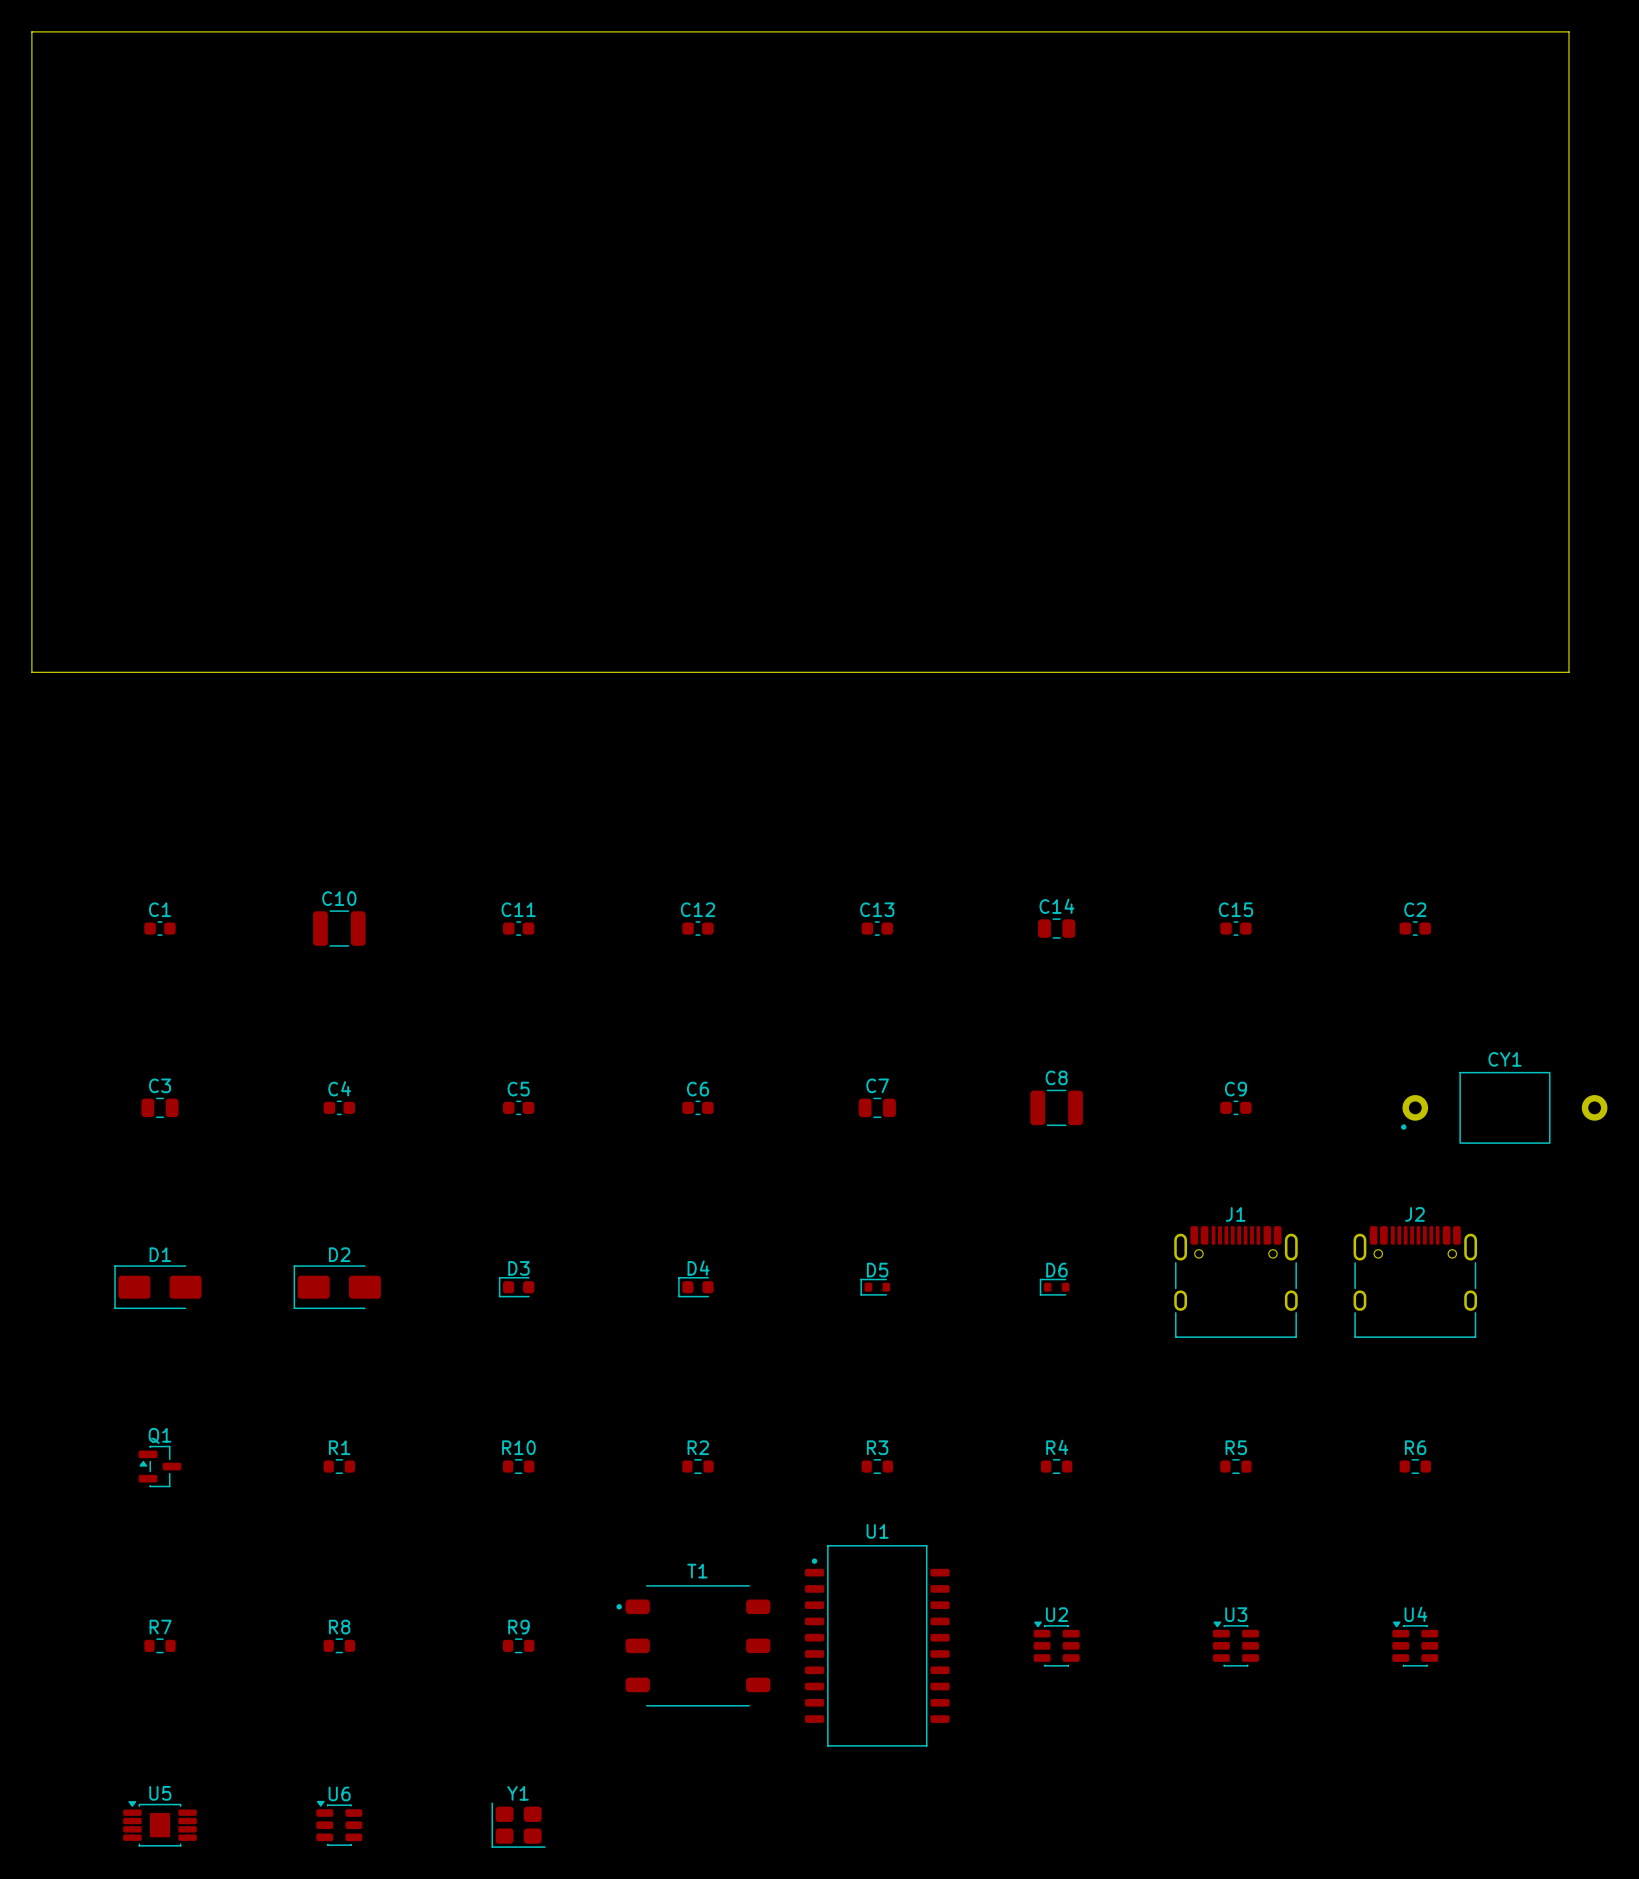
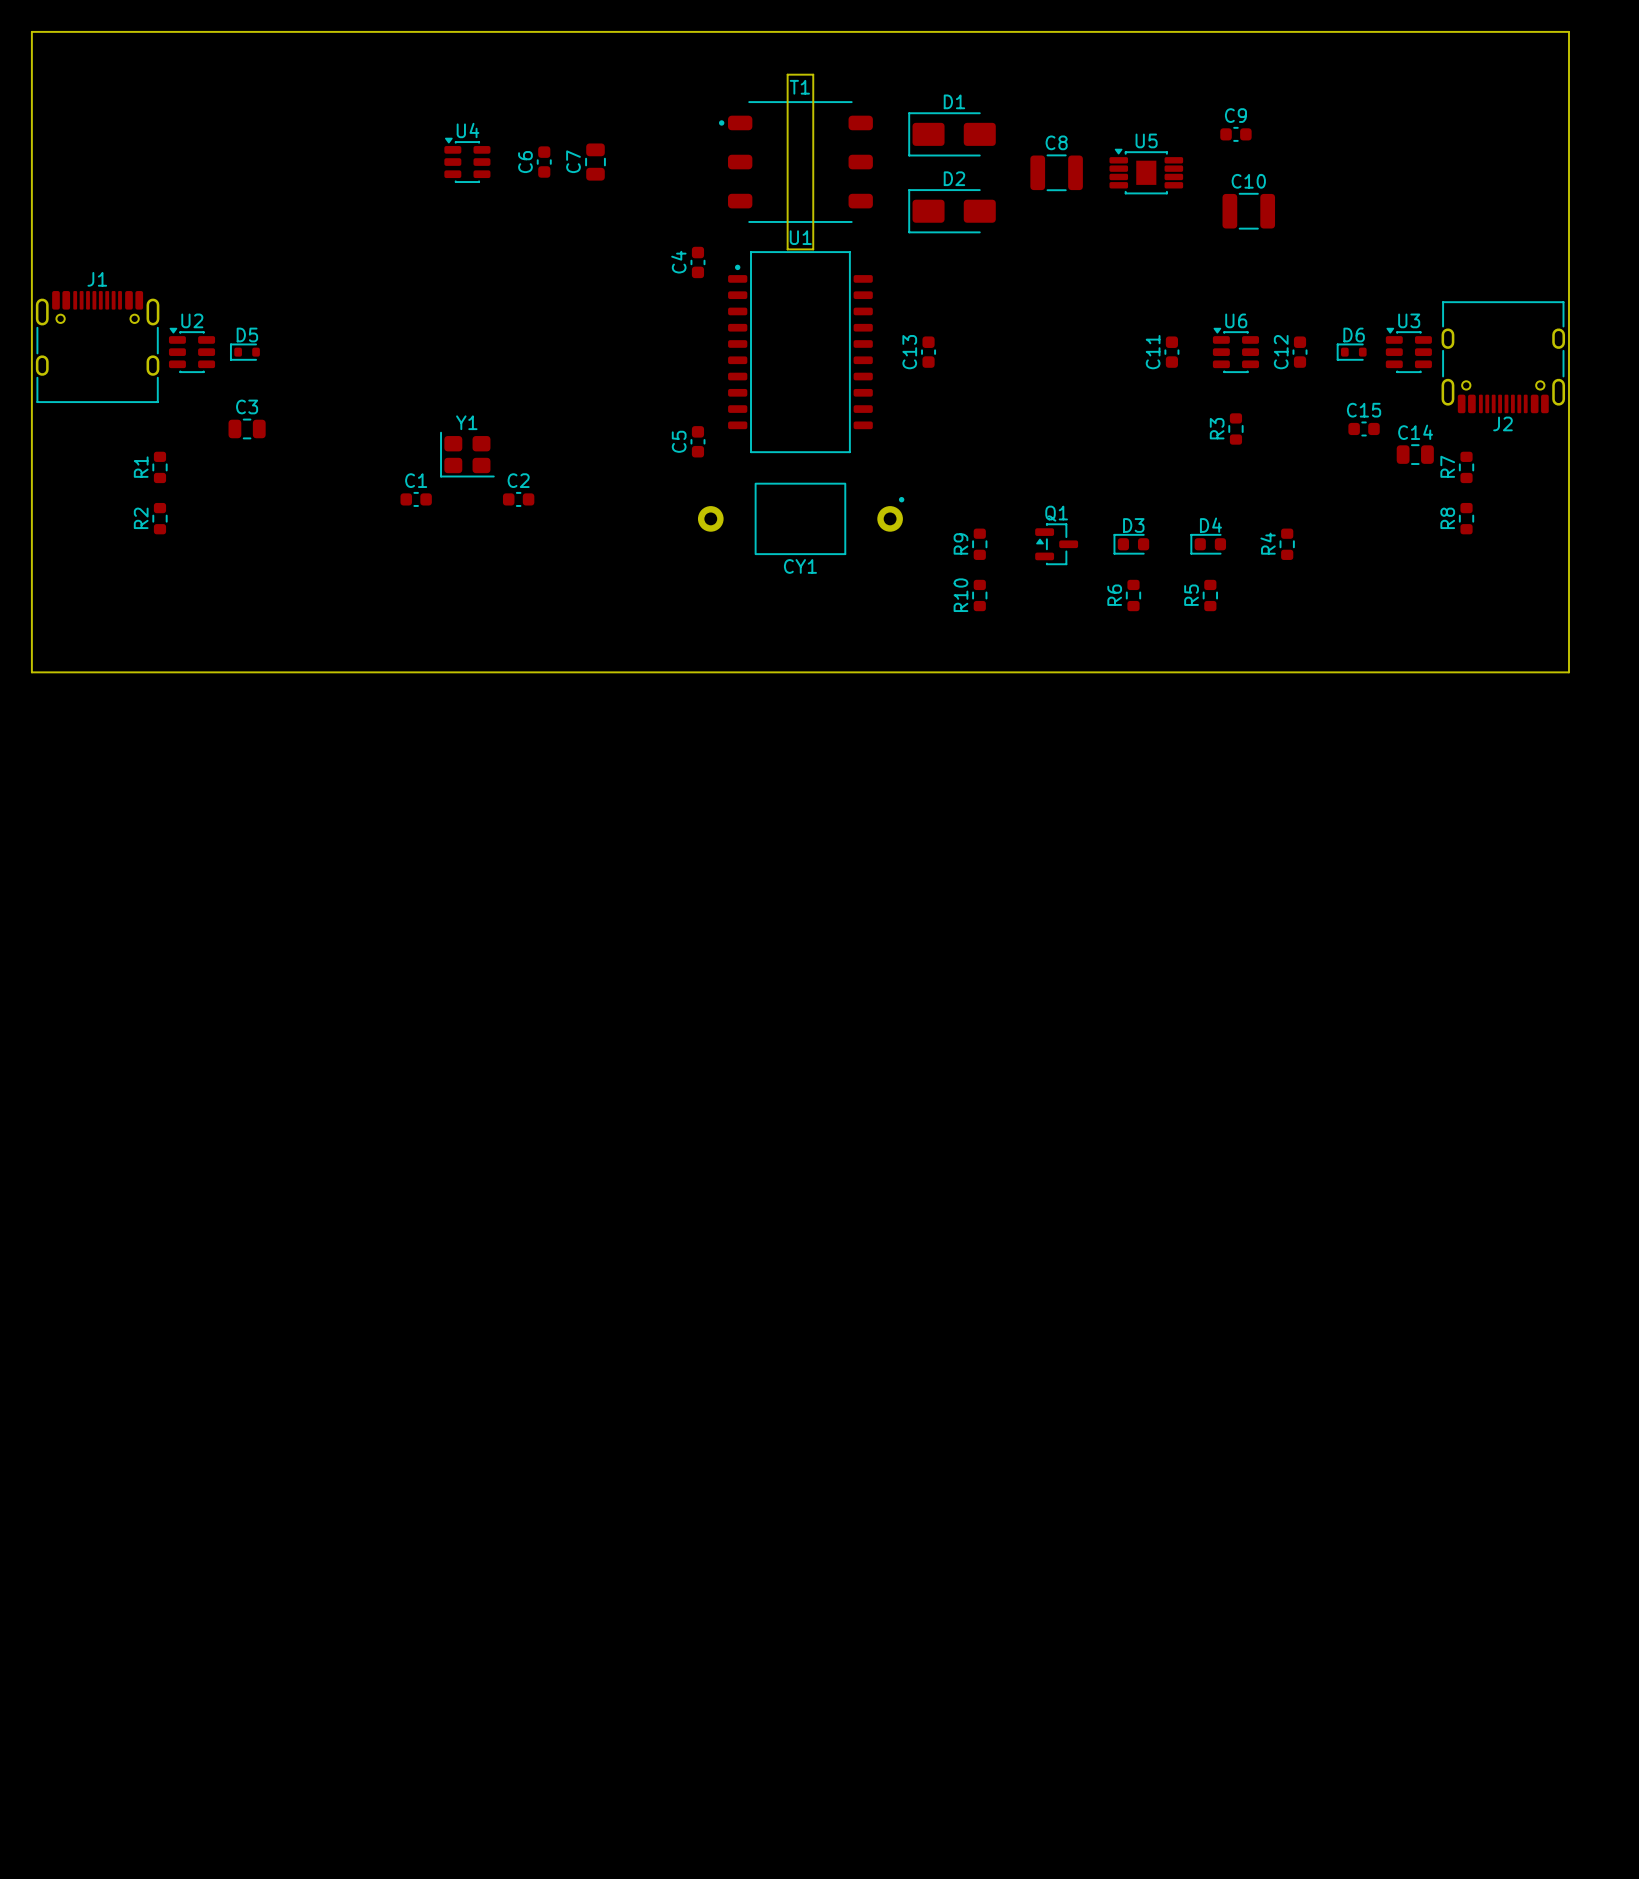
board edge: none -> (787, 74) (813, 74) (813, 249) (787, 249) (787, 74)
C11 name position: C11 (518, 909) -> C11 (1153, 352)
C12 name position: C12 (697, 909) -> C12 (1281, 352)
C13 name position: C13 (877, 909) -> C13 (909, 352)
C1 position: (159, 928) -> (416, 499)
C10 position: (339, 928) -> (1248, 211)
C11 rotation: 0° (518, 928) -> 90° clockwise (1171, 352)
C11 position: (518, 928) -> (1171, 352)
C12 rotation: 0° (697, 928) -> 90° clockwise (1300, 352)
C12 position: (697, 928) -> (1300, 352)
C13 rotation: 0° (877, 928) -> 90° clockwise (928, 352)
C13 position: (877, 928) -> (928, 352)
C14 position: (1056, 928) -> (1415, 454)
C15 position: (1235, 928) -> (1364, 428)
C2 position: (1415, 928) -> (518, 499)
C7 name position: C7 (877, 1085) -> C7 (573, 161)
C4 name position: C4 (339, 1088) -> C4 (678, 262)
C5 name position: C5 (518, 1089) -> C5 (679, 441)
C6 name position: C6 (697, 1089) -> C6 (525, 162)
C3 position: (159, 1107) -> (247, 428)
C4 rotation: 0° (339, 1107) -> 90° clockwise (697, 262)
C4 position: (339, 1107) -> (697, 262)
C5 rotation: 0° (518, 1107) -> 90° clockwise (697, 441)
C5 position: (518, 1107) -> (697, 441)
C6 rotation: 0° (697, 1107) -> 90° clockwise (544, 162)
C6 position: (697, 1107) -> (544, 162)
C7 rotation: 0° (877, 1107) -> 90° clockwise (595, 162)
C7 position: (877, 1107) -> (595, 162)
C8 position: (1056, 1107) -> (1056, 172)
C9 position: (1235, 1107) -> (1235, 134)
CY1 rotation: 0° (1504, 1107) -> 180° (801, 518)
CY1 position: (1504, 1107) -> (801, 518)
J1 position: (1235, 1282) -> (97, 346)
J2 rotation: 0° (1415, 1282) -> 180° (1503, 357)
J2 position: (1415, 1282) -> (1503, 357)
D1 position: (157, 1287) -> (952, 134)
D2 position: (337, 1287) -> (952, 211)
D3 position: (516, 1287) -> (1131, 544)
D4 position: (695, 1287) -> (1208, 544)
D5 position: (875, 1287) -> (245, 352)
D6 position: (1054, 1287) -> (1351, 352)
R1 name position: R1 (339, 1447) -> R1 (141, 467)
R10 name position: R10 (518, 1447) -> R10 (960, 595)
R2 name position: R2 (698, 1447) -> R2 (141, 518)
R3 name position: R3 (877, 1447) -> R3 (1217, 428)
R4 name position: R4 (1057, 1447) -> R4 (1268, 543)
R5 name position: R5 (1236, 1447) -> R5 (1191, 595)
R6 name position: R6 (1415, 1447) -> R6 (1114, 595)
Q1 position: (159, 1466) -> (1056, 544)
R1 rotation: 0° (339, 1466) -> 90° clockwise (159, 467)
R1 position: (339, 1466) -> (159, 467)
R10 rotation: 0° (518, 1466) -> 90° clockwise (979, 595)
R10 position: (518, 1466) -> (979, 595)
R2 rotation: 0° (697, 1466) -> 90° clockwise (159, 518)
R2 position: (697, 1466) -> (159, 518)
R3 rotation: 0° (877, 1466) -> 90° clockwise (1235, 428)
R3 position: (877, 1466) -> (1235, 428)
R4 rotation: 0° (1056, 1466) -> 90° clockwise (1287, 544)
R4 position: (1056, 1466) -> (1287, 544)
R5 rotation: 0° (1235, 1466) -> 90° clockwise (1210, 595)
R5 position: (1235, 1466) -> (1210, 595)
R6 rotation: 0° (1415, 1466) -> 90° clockwise (1133, 595)
R6 position: (1415, 1466) -> (1133, 595)
R7 name position: R7 (160, 1627) -> R7 (1447, 466)
R8 name position: R8 (339, 1627) -> R8 (1447, 518)
R9 name position: R9 (518, 1627) -> R9 (960, 543)
U2 position: (1056, 1644) -> (192, 350)
U3 position: (1235, 1644) -> (1408, 350)
U4 position: (1415, 1644) -> (467, 160)
R7 rotation: 0° (159, 1645) -> 90° clockwise (1466, 467)
R7 position: (159, 1645) -> (1466, 467)
R8 rotation: 0° (339, 1645) -> 90° clockwise (1466, 518)
R8 position: (339, 1645) -> (1466, 518)
R9 rotation: 0° (518, 1645) -> 90° clockwise (979, 544)
R9 position: (518, 1645) -> (979, 544)
T1 position: (693, 1645) -> (795, 162)
U1 position: (877, 1645) -> (800, 352)
U5 position: (159, 1823) -> (1146, 171)
U6 position: (339, 1823) -> (1235, 350)
Y1 position: (518, 1825) -> (467, 454)

